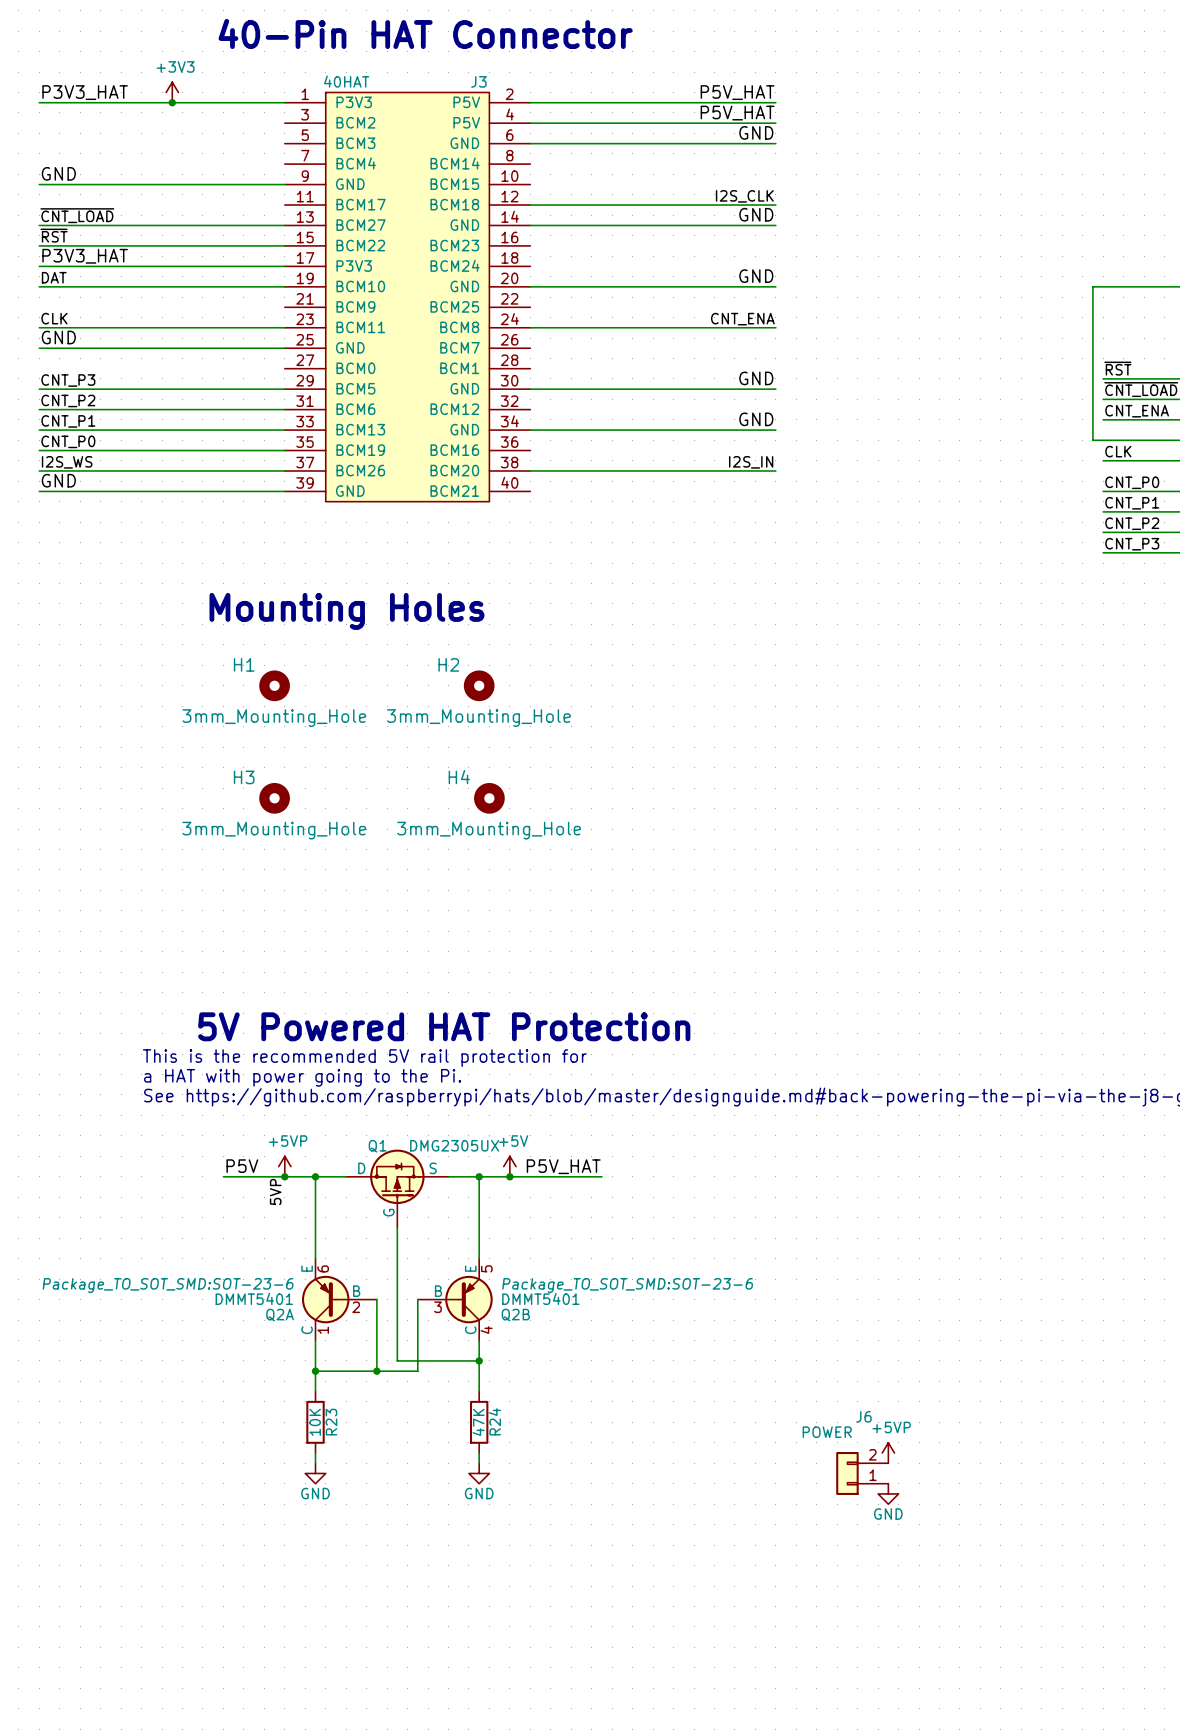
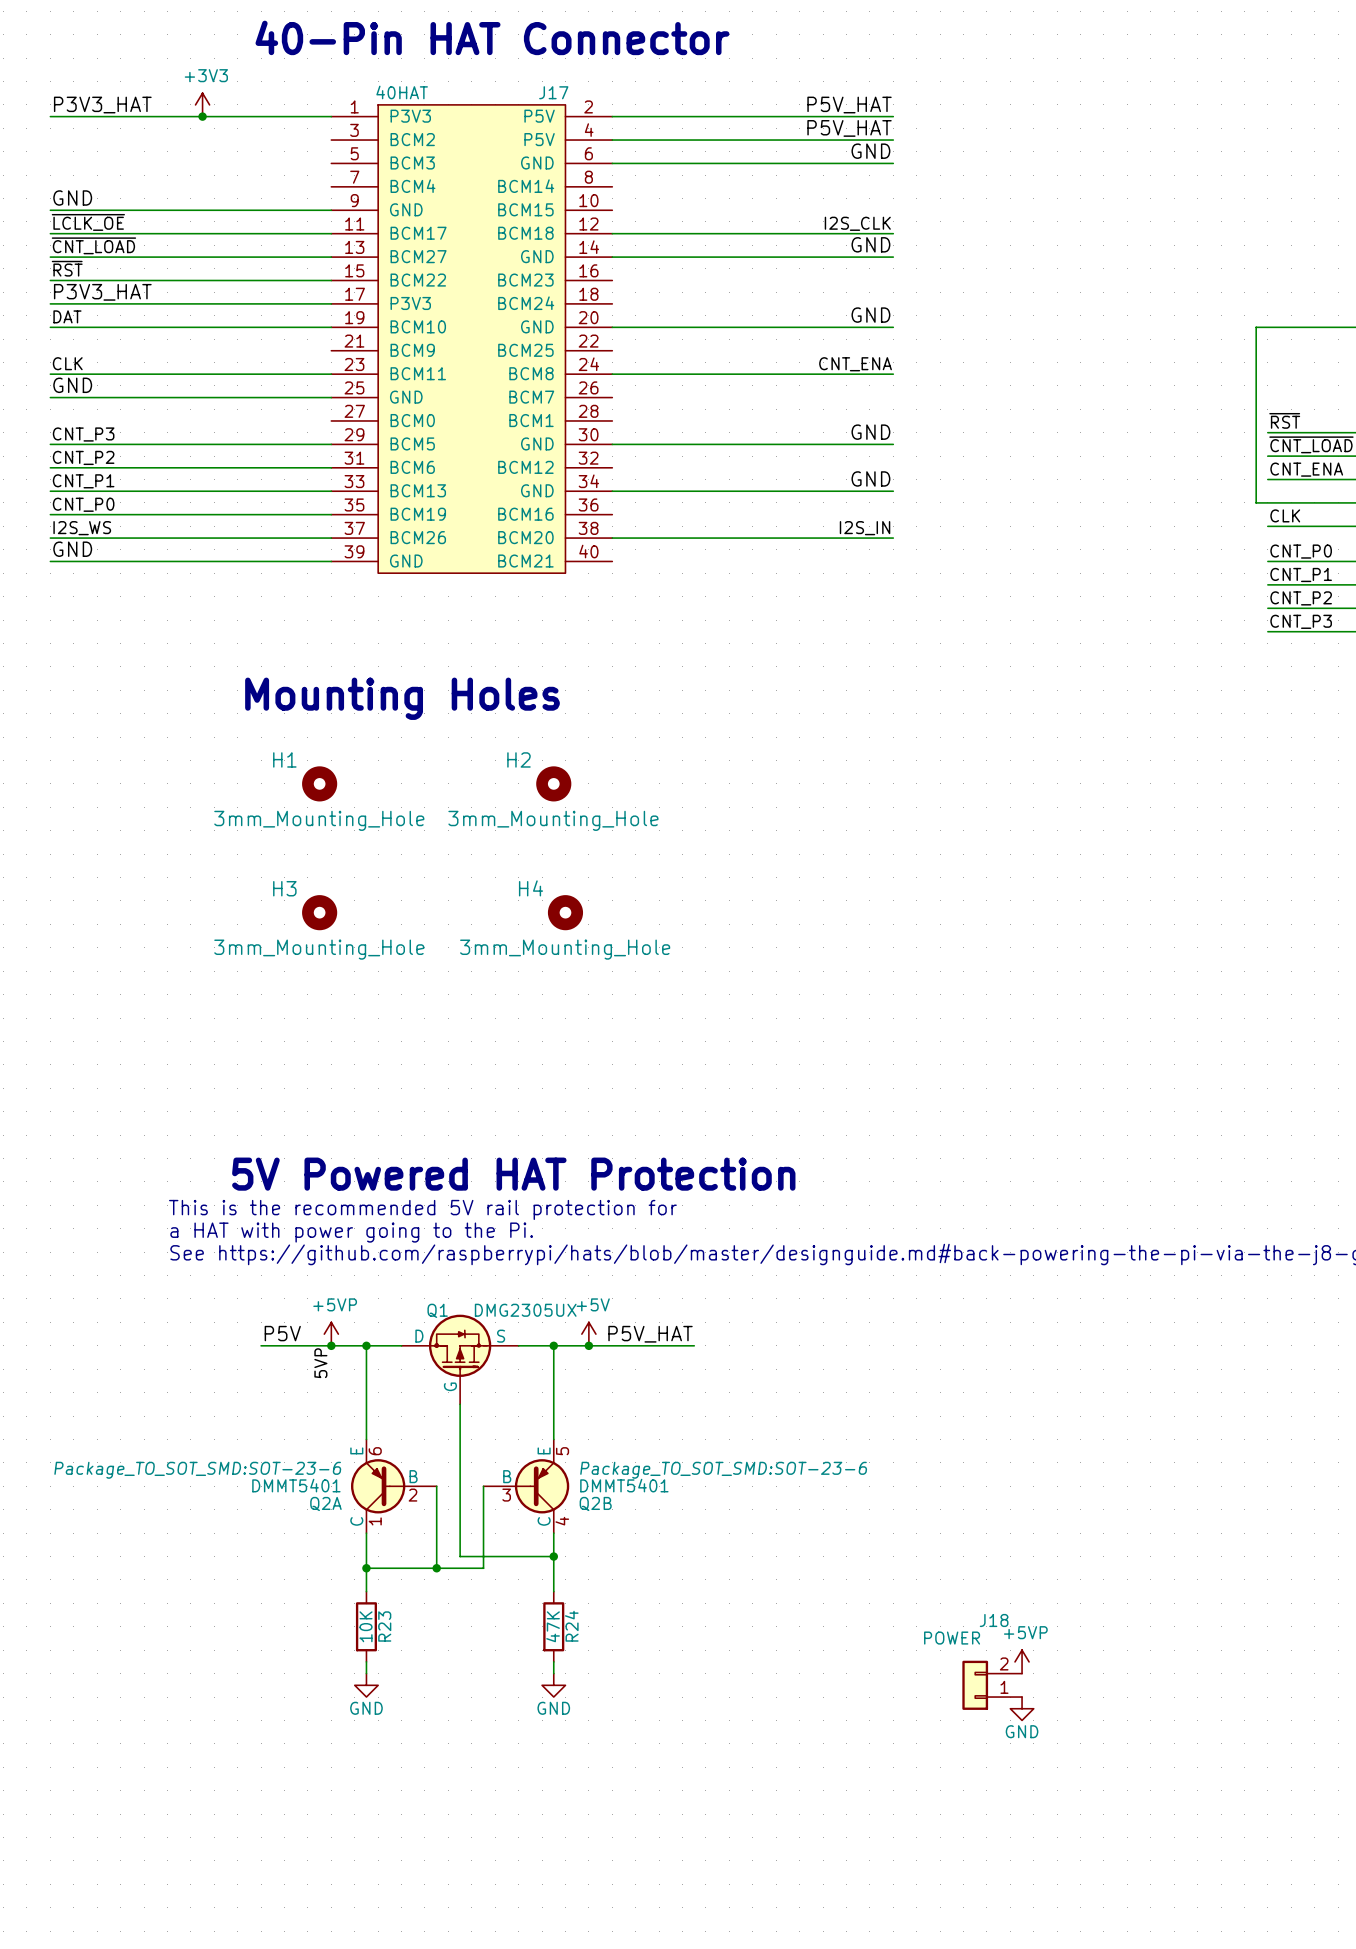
J3 name: J3 (478, 81) -> J17 (553, 92)
label: none -> ~{LCLK_OE} (88, 222)
wire: none -> (50, 233) (331, 233)
J6 name: J6 (863, 1416) -> J18 (994, 1620)

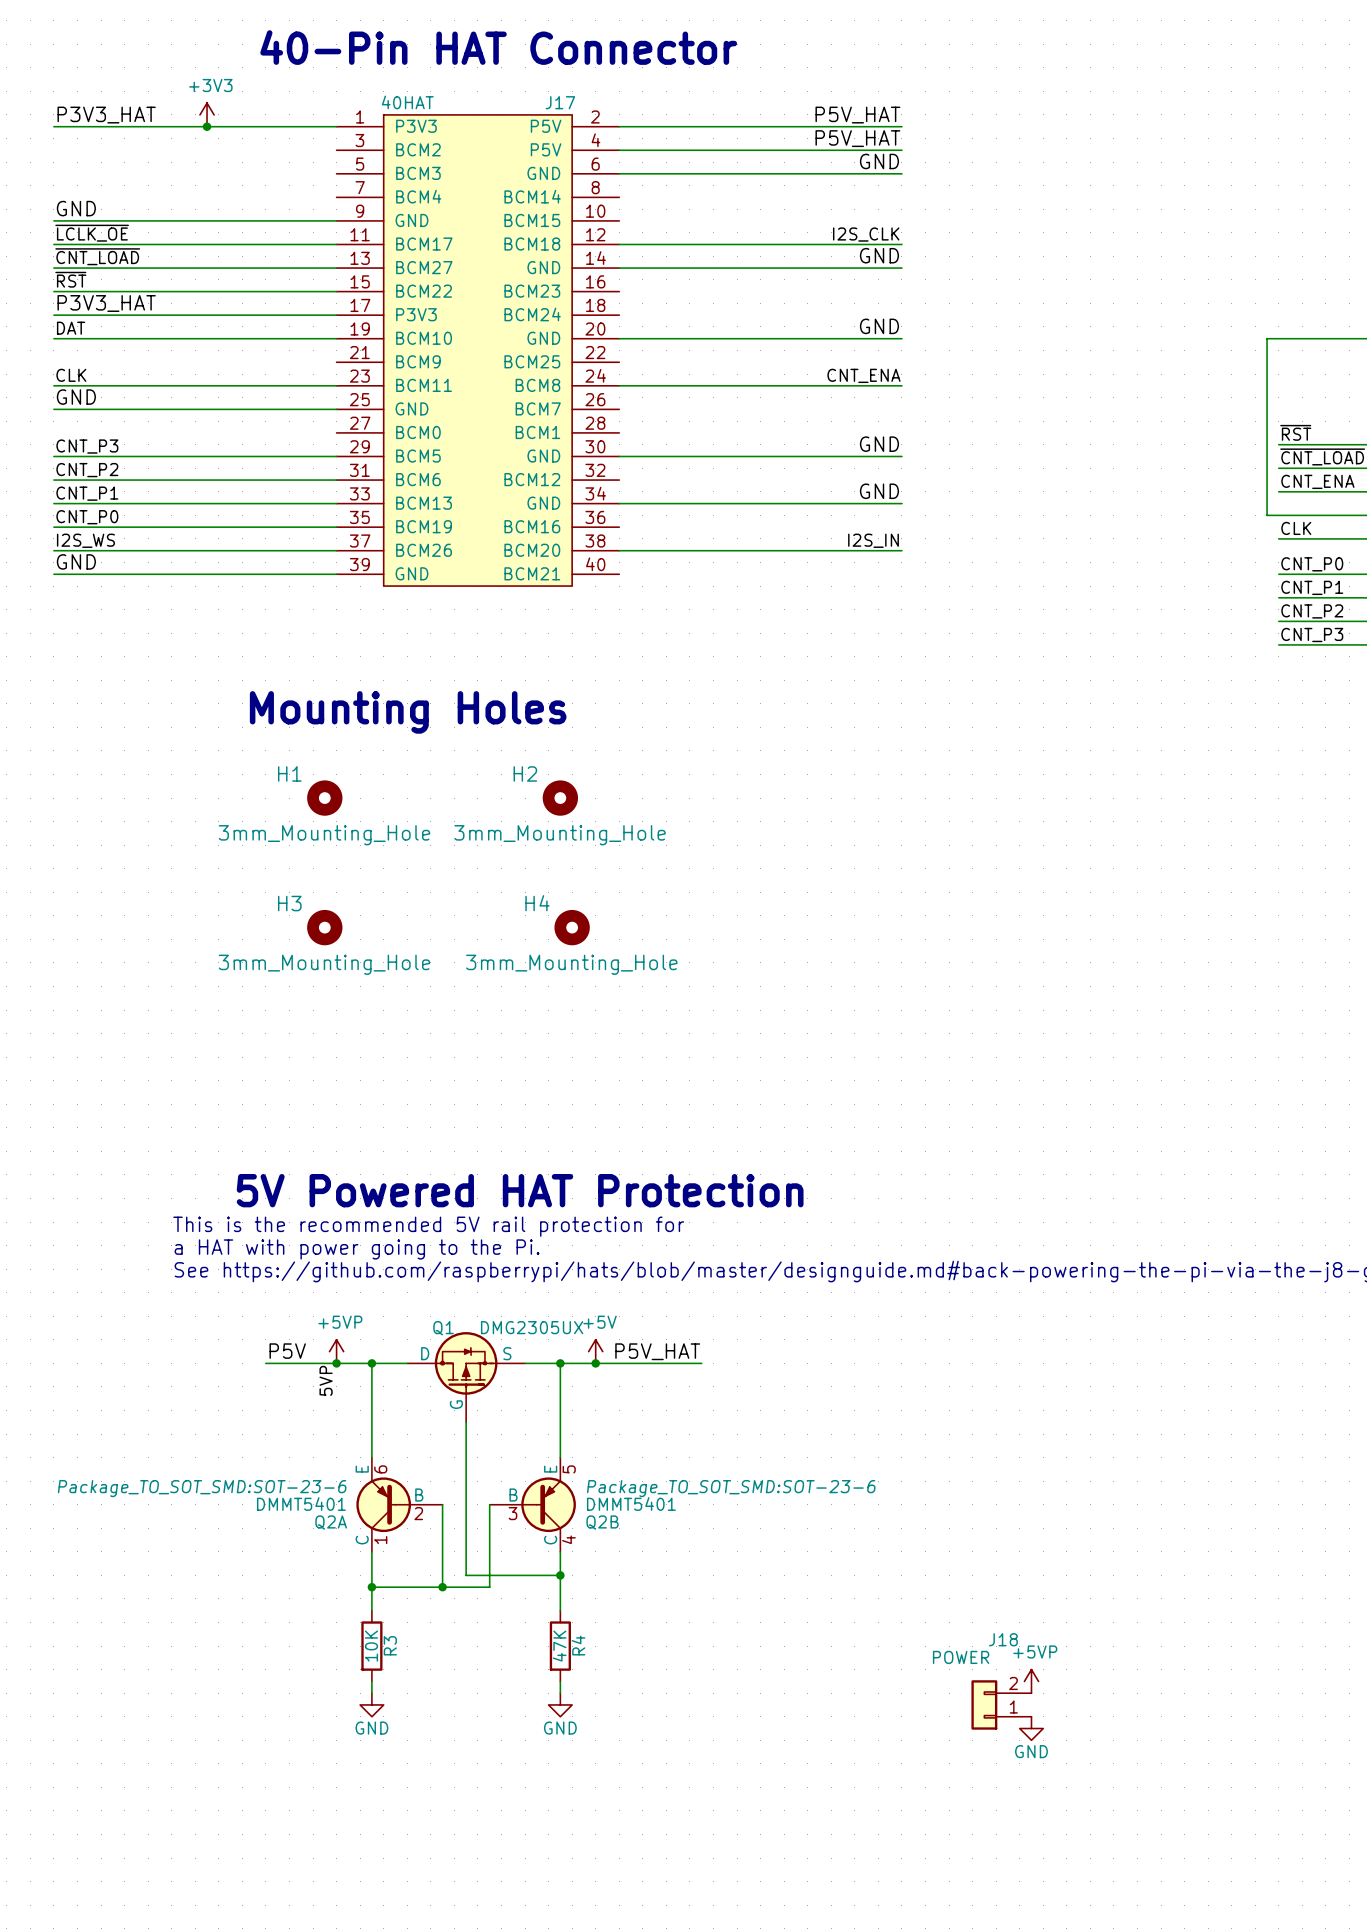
R23 name: R23 (384, 1626) -> R3 (390, 1645)
R24 name: R24 (571, 1626) -> R4 (578, 1645)

